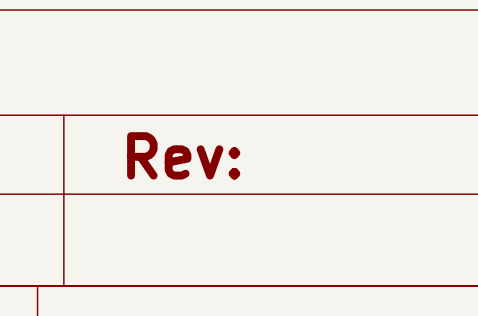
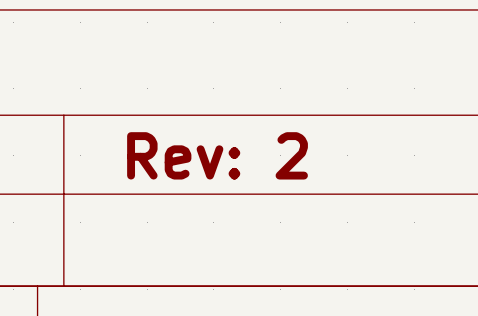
title block: Rev: (183, 155) -> Rev: 2 (217, 155)

